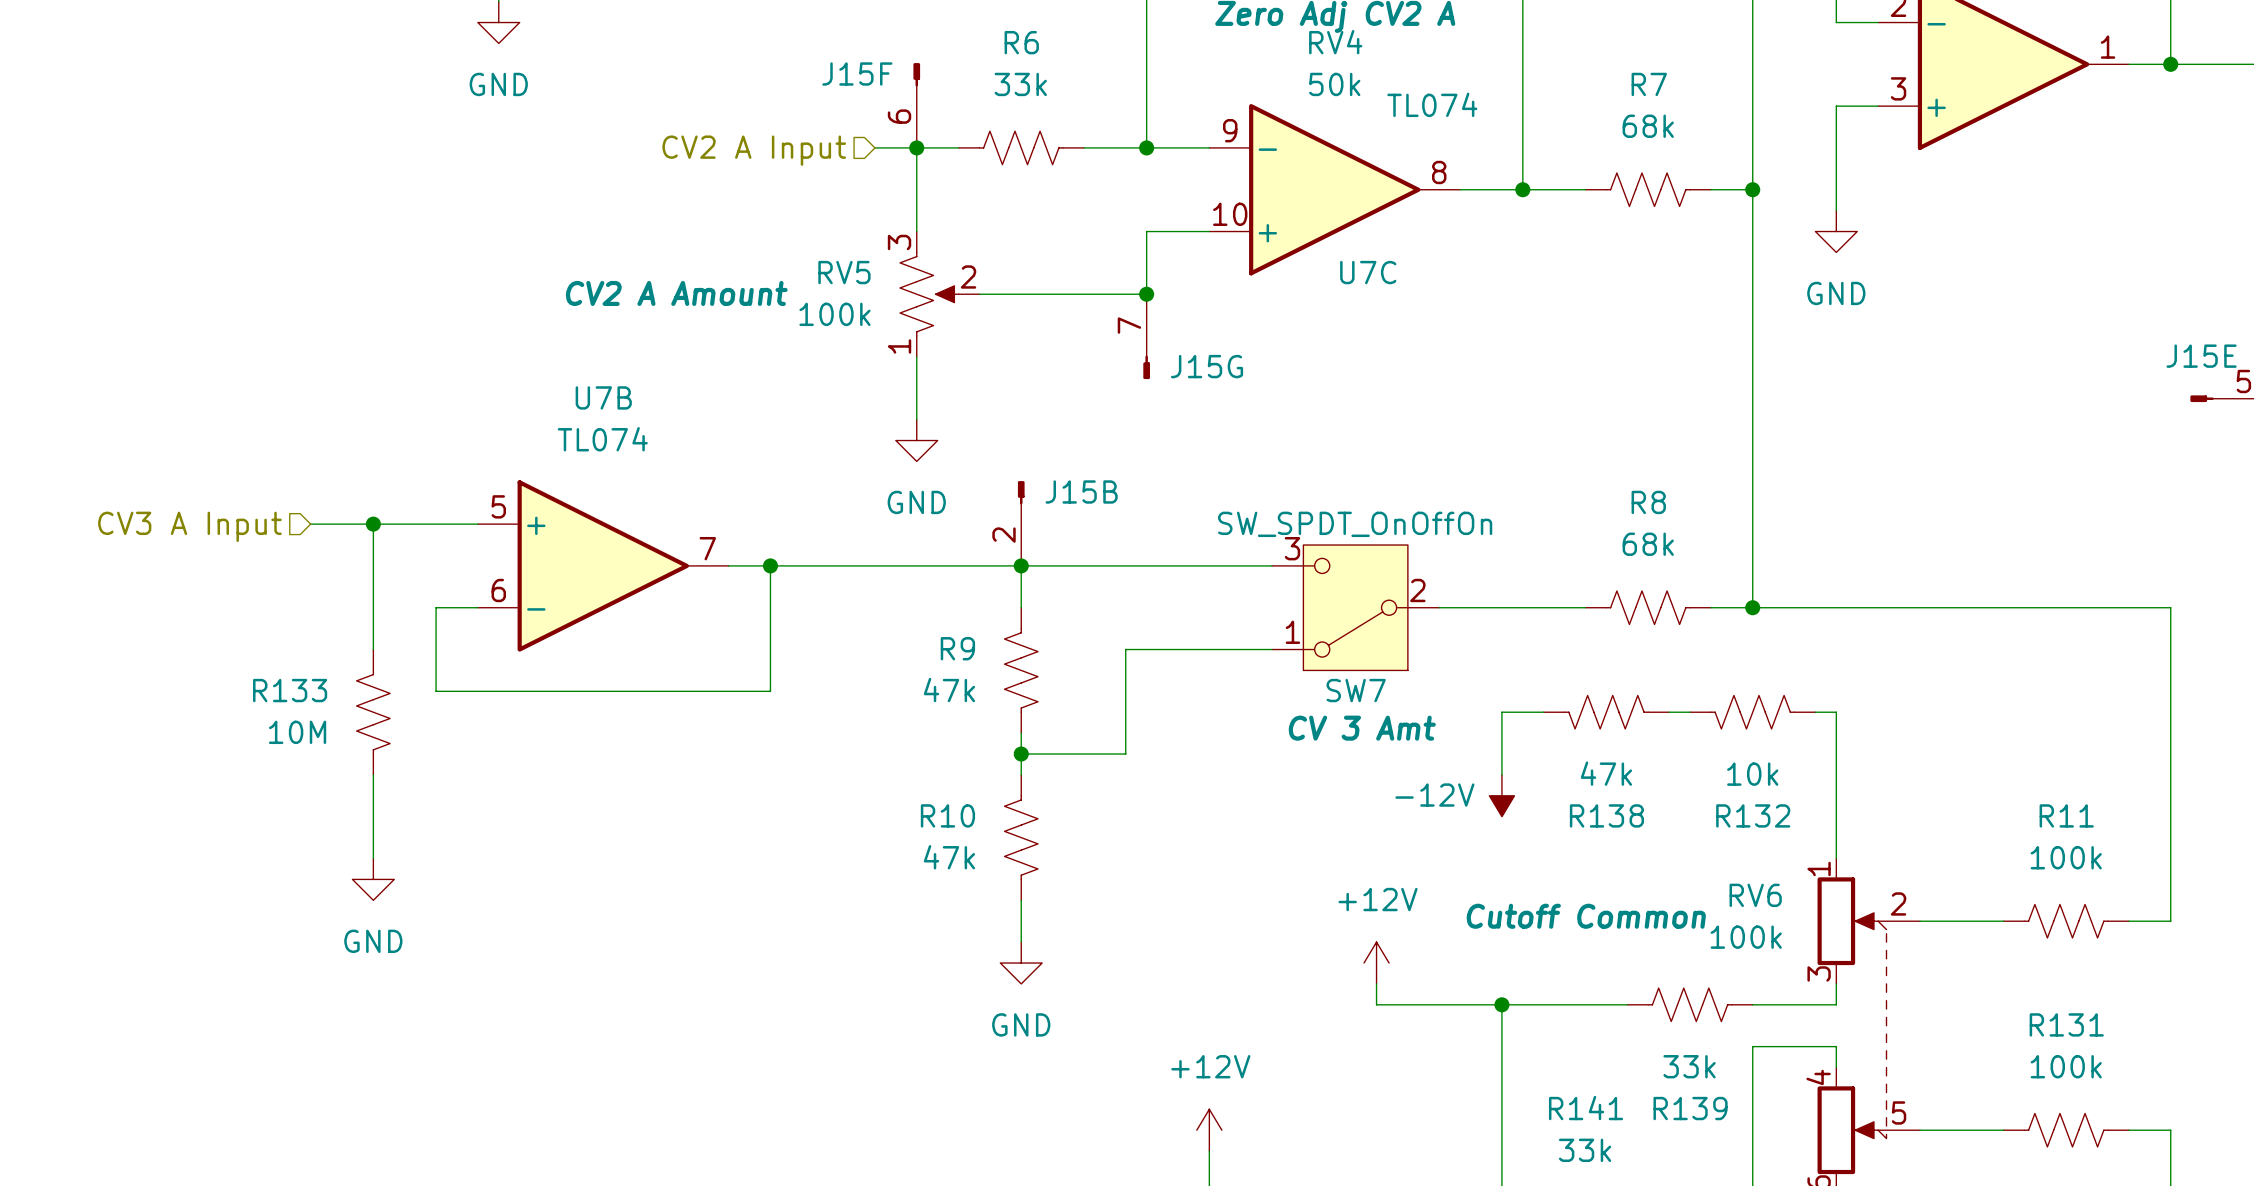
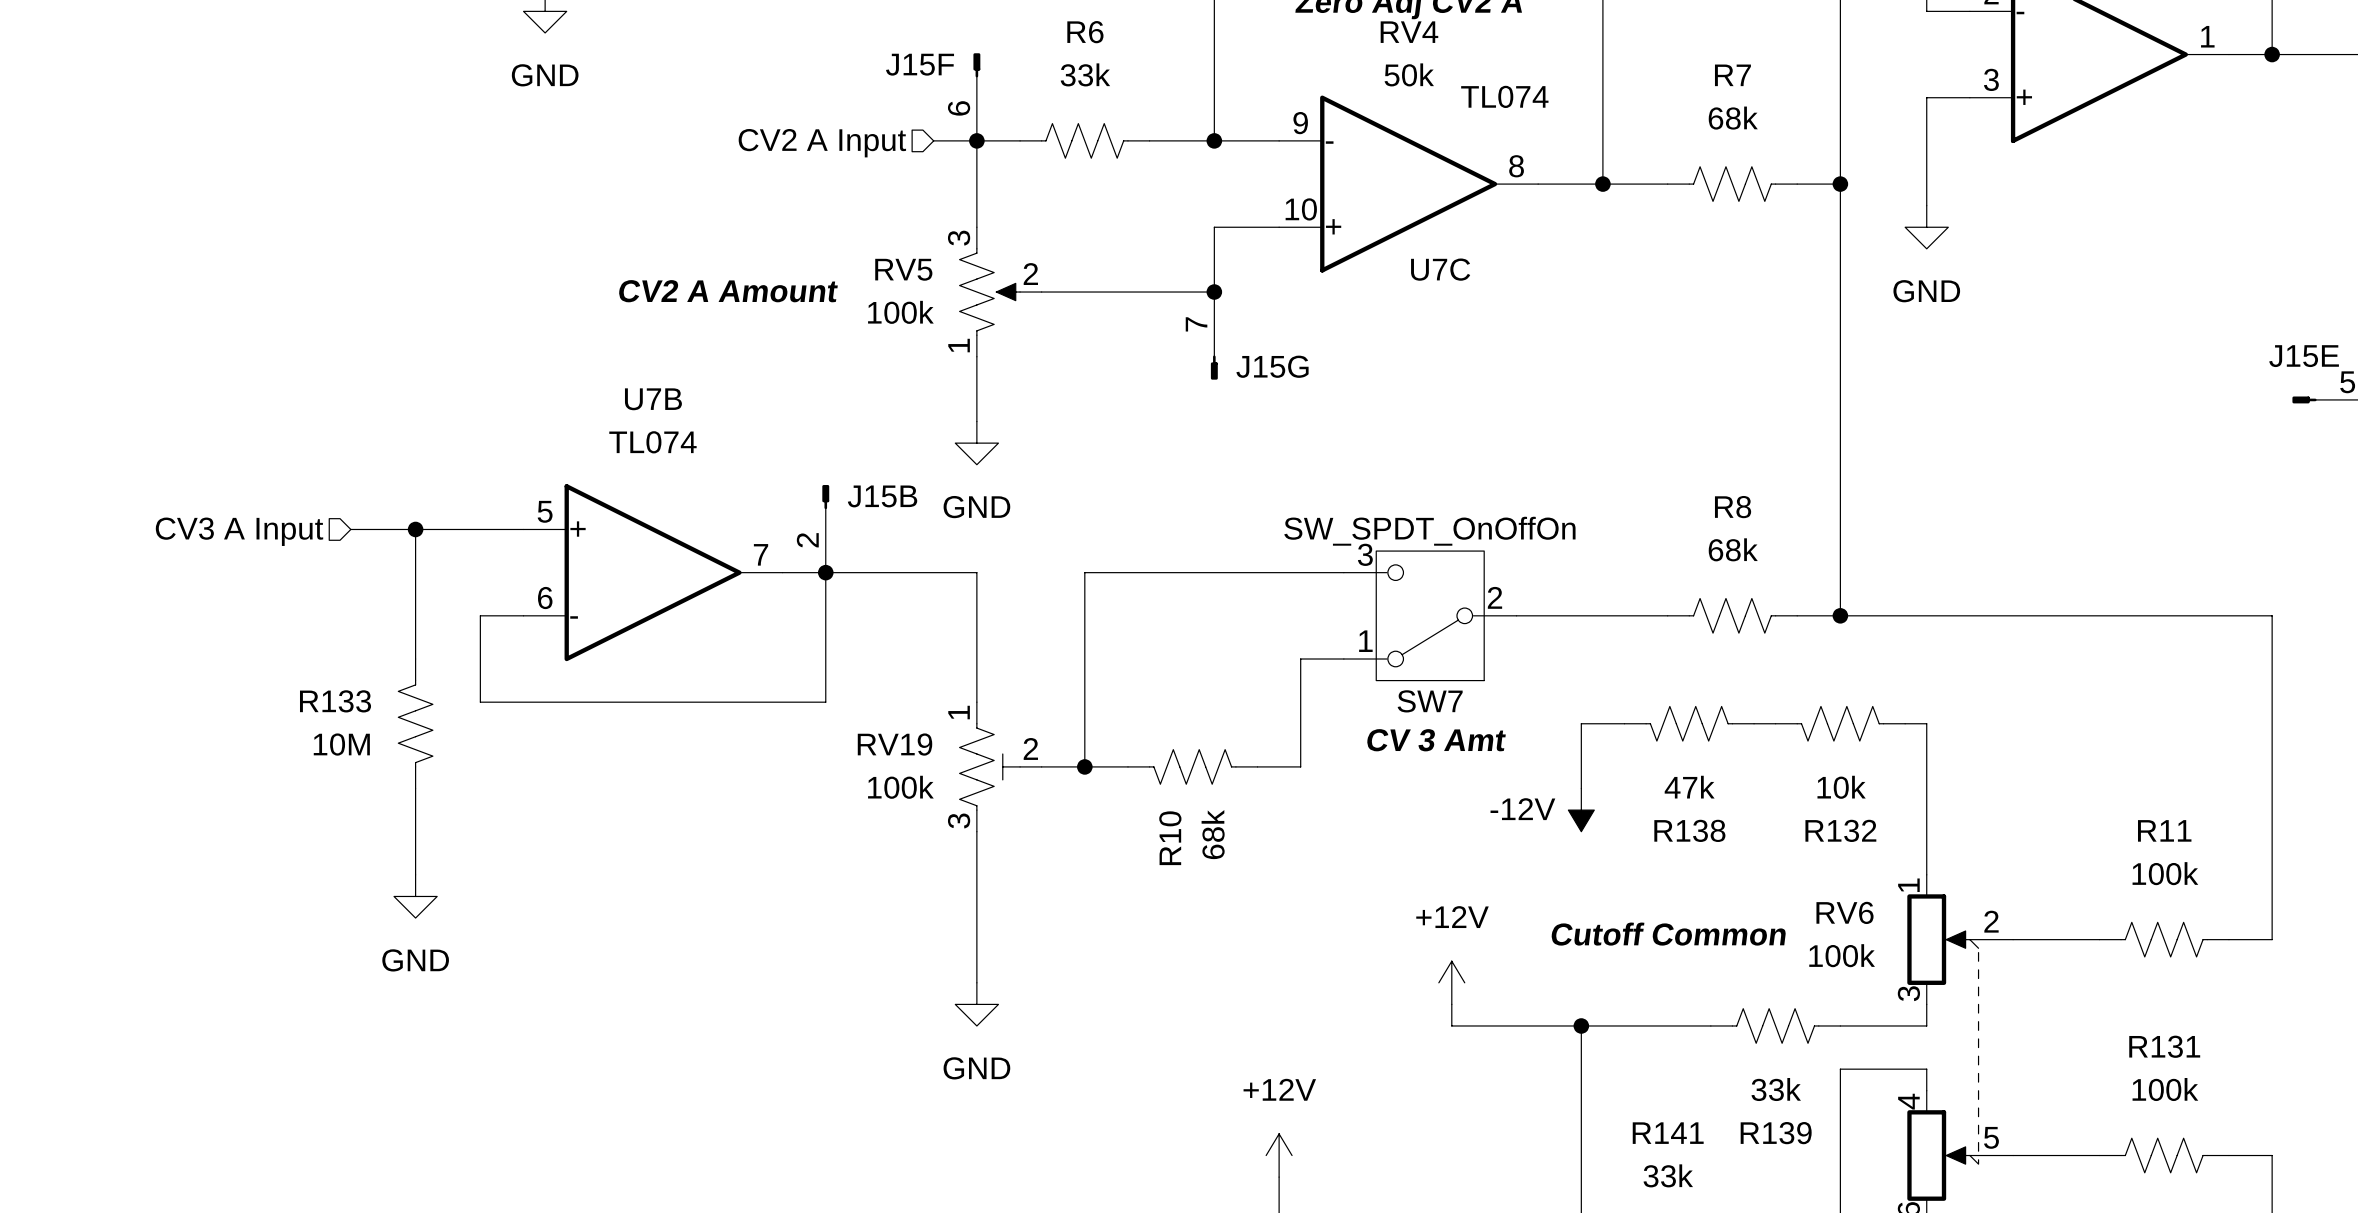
J15B position: (1021, 523) -> (825, 528)
wire: (916, 565) (1021, 565) -> (976, 572) (976, 702)
junction: (1021, 565) -> none
wire: none -> (1084, 615) (1084, 745)
wire: (1230, 649) (1125, 649) (1125, 754) (1063, 754) -> (1300, 659) (1300, 766) (1257, 766)
R9: 47k (1021, 670) -> none
RV19: none -> 100k (1000, 766)
wire: (1021, 754) (1021, 774) -> (1084, 766) (1041, 766)
R10 name position: R10 (947, 815) -> R10 (1170, 838)
wire: none -> (976, 831) (976, 982)
R10 rotation: 0° (1021, 837) -> 90° clockwise (1192, 766)
R10 position: (1021, 837) -> (1192, 766)
R10 value: 47k (949, 857) -> 68k (1213, 834)
wire: (1021, 900) (1021, 942) -> none
power symbol position: GND (1021, 963) -> GND (976, 1004)

